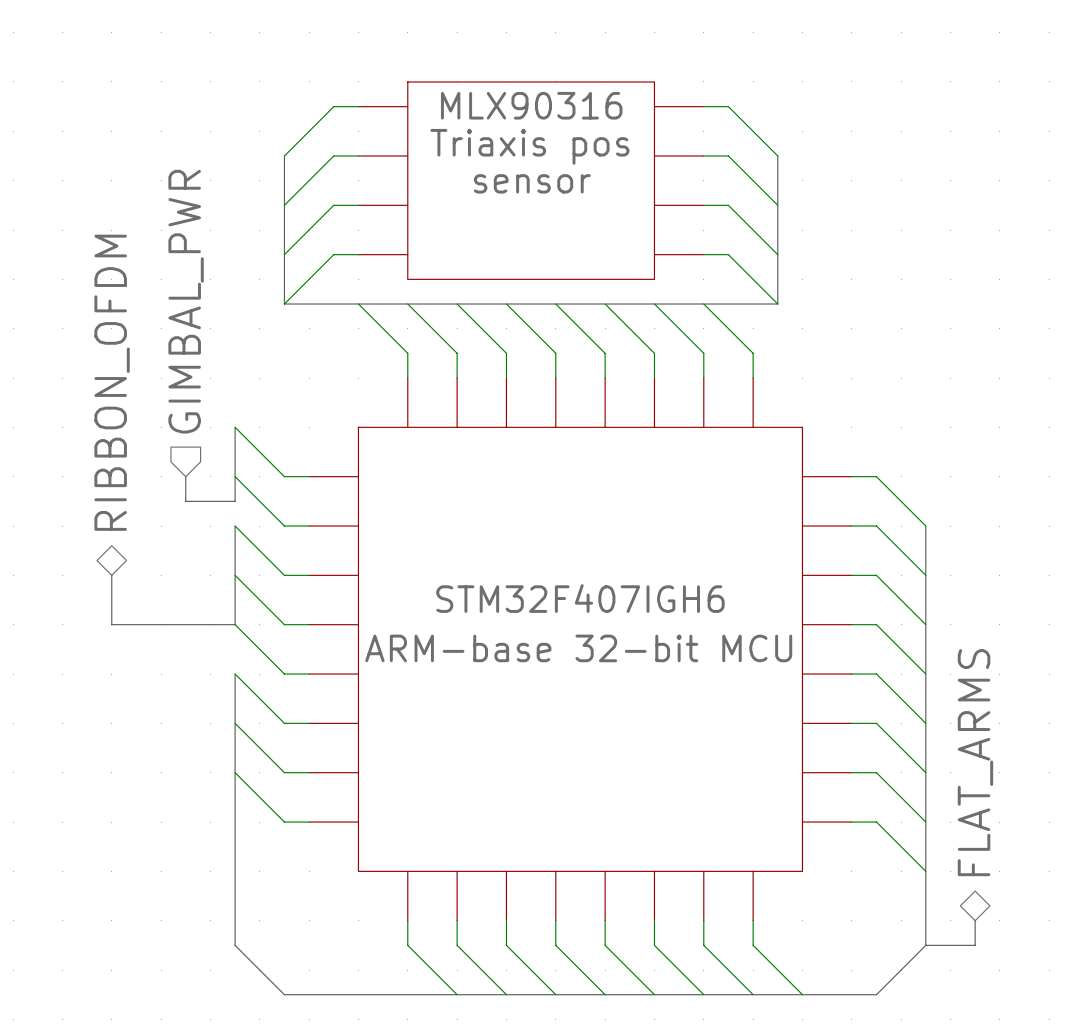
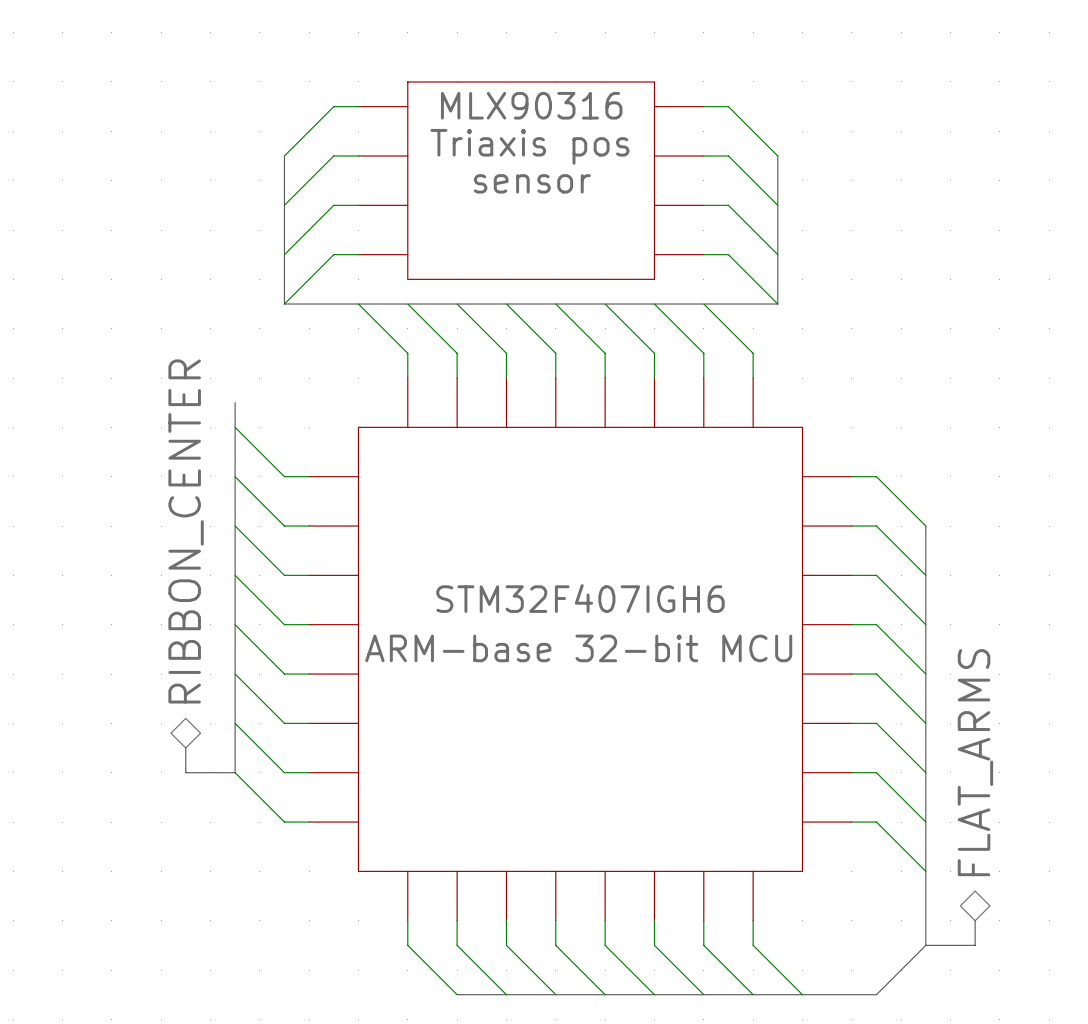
hierarchical label: GIMBAL_PWR (186, 301) -> none
hierarchical label: RIBBON_OFDM (112, 382) -> none
bus: none -> (235, 402) (235, 427)
bus: (185, 476) (185, 501) (235, 501) -> (235, 526) (235, 501)
hierarchical label: none -> RIBBON_CENTER (186, 531)
bus: (111, 575) (111, 624) (235, 624) -> (235, 674) (235, 624)
bus: (235, 772) (235, 945) (284, 994) (457, 994) -> (235, 772) (185, 772) (185, 748)

